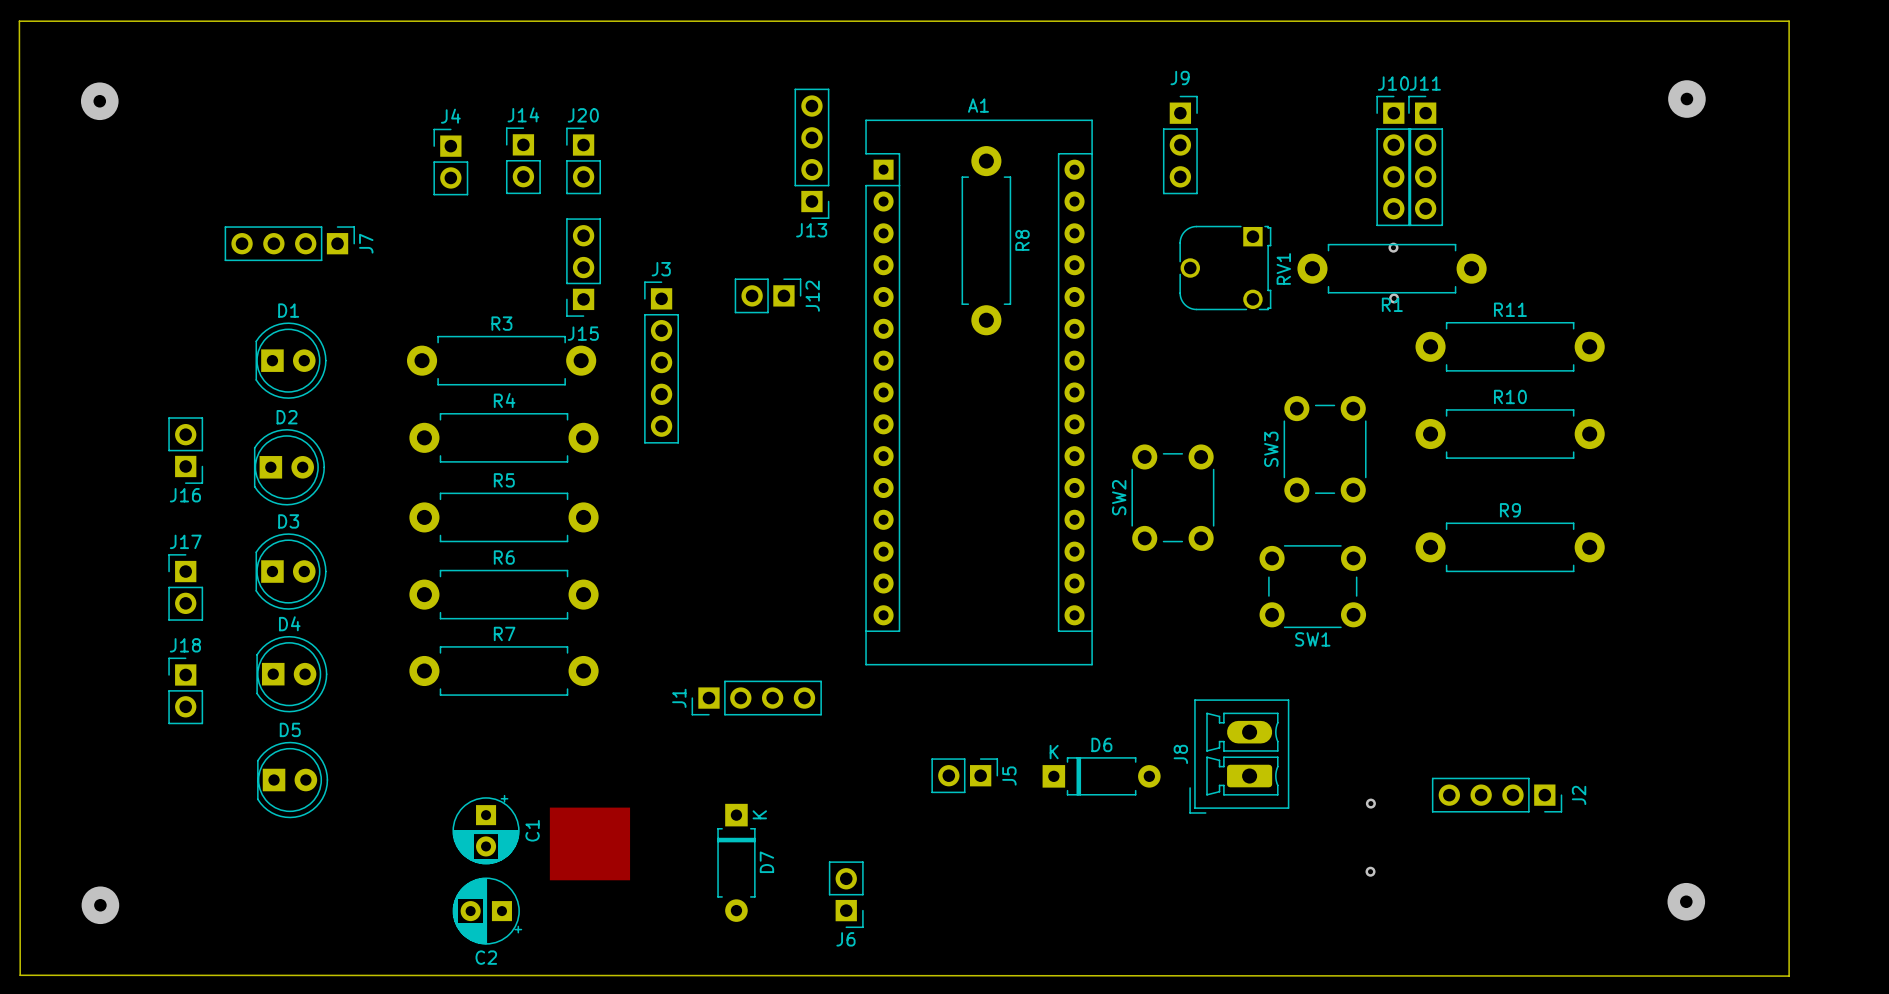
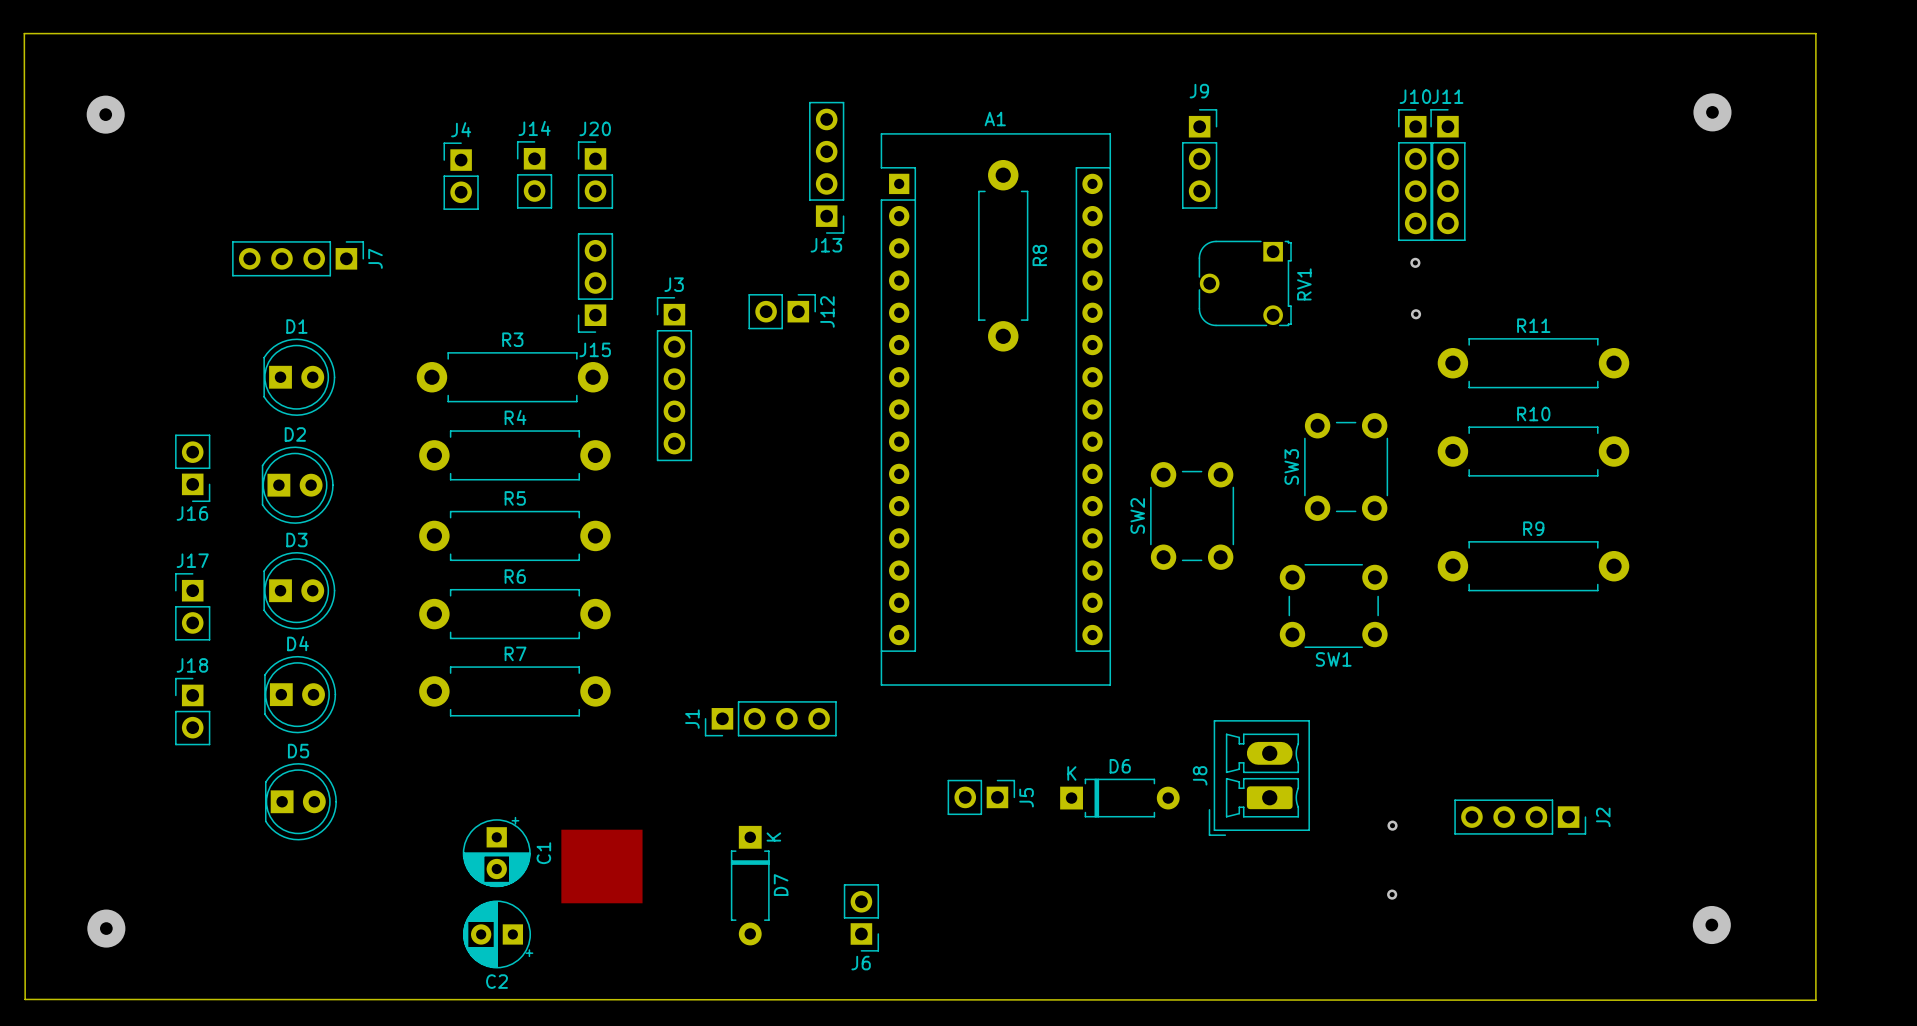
R1: (1392, 268) -> none

